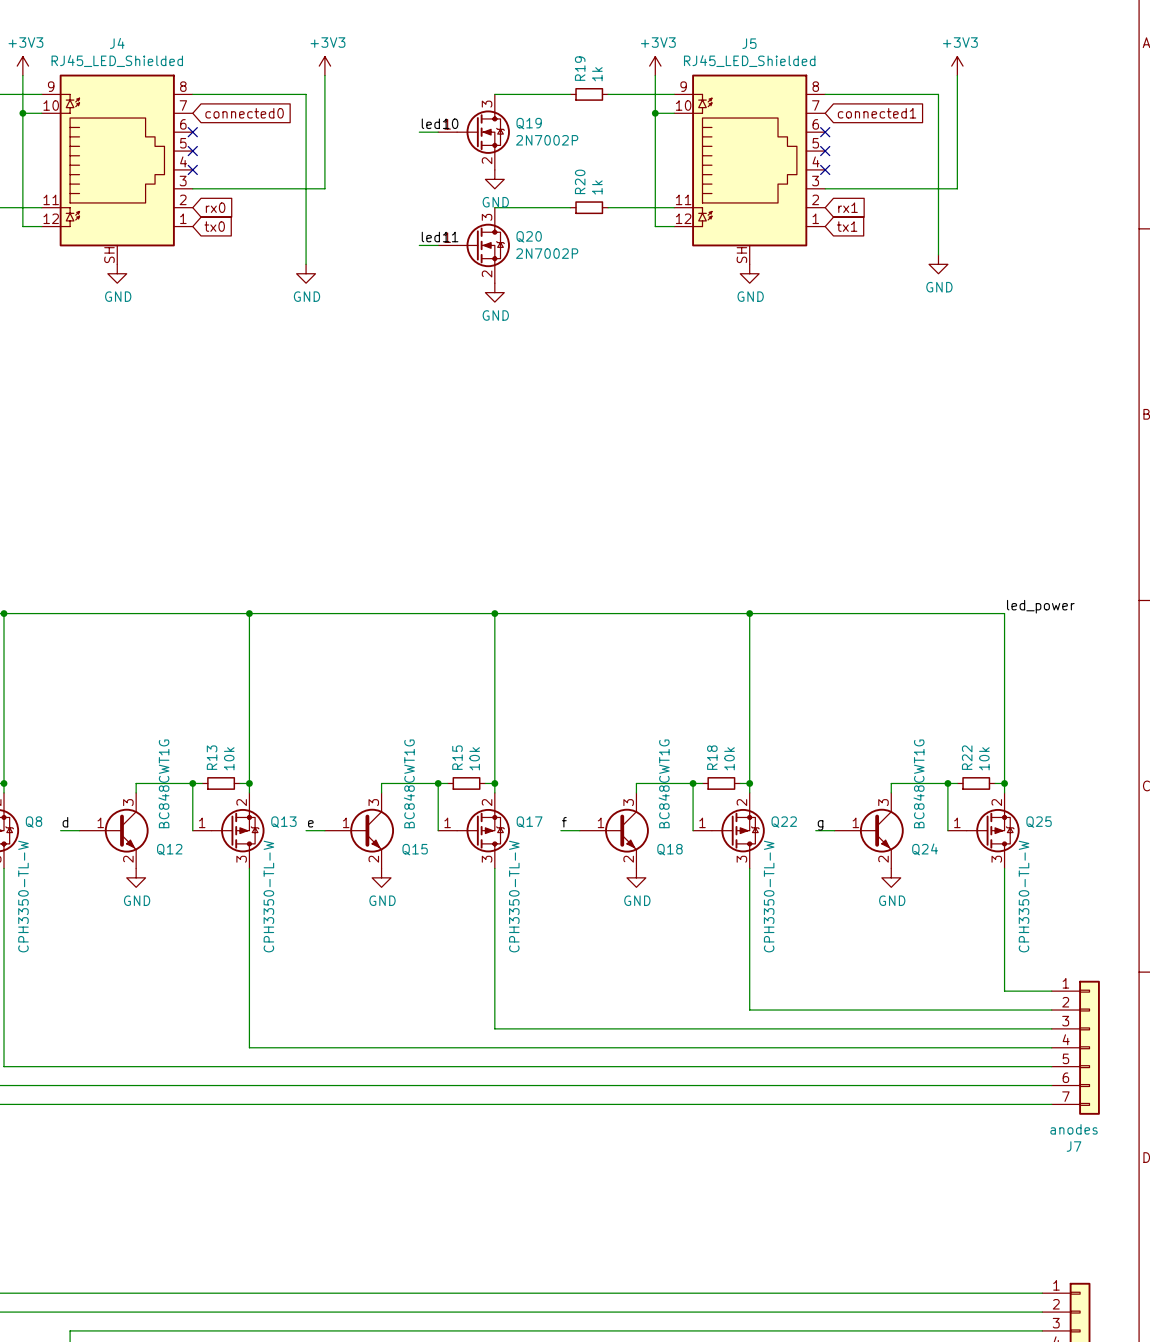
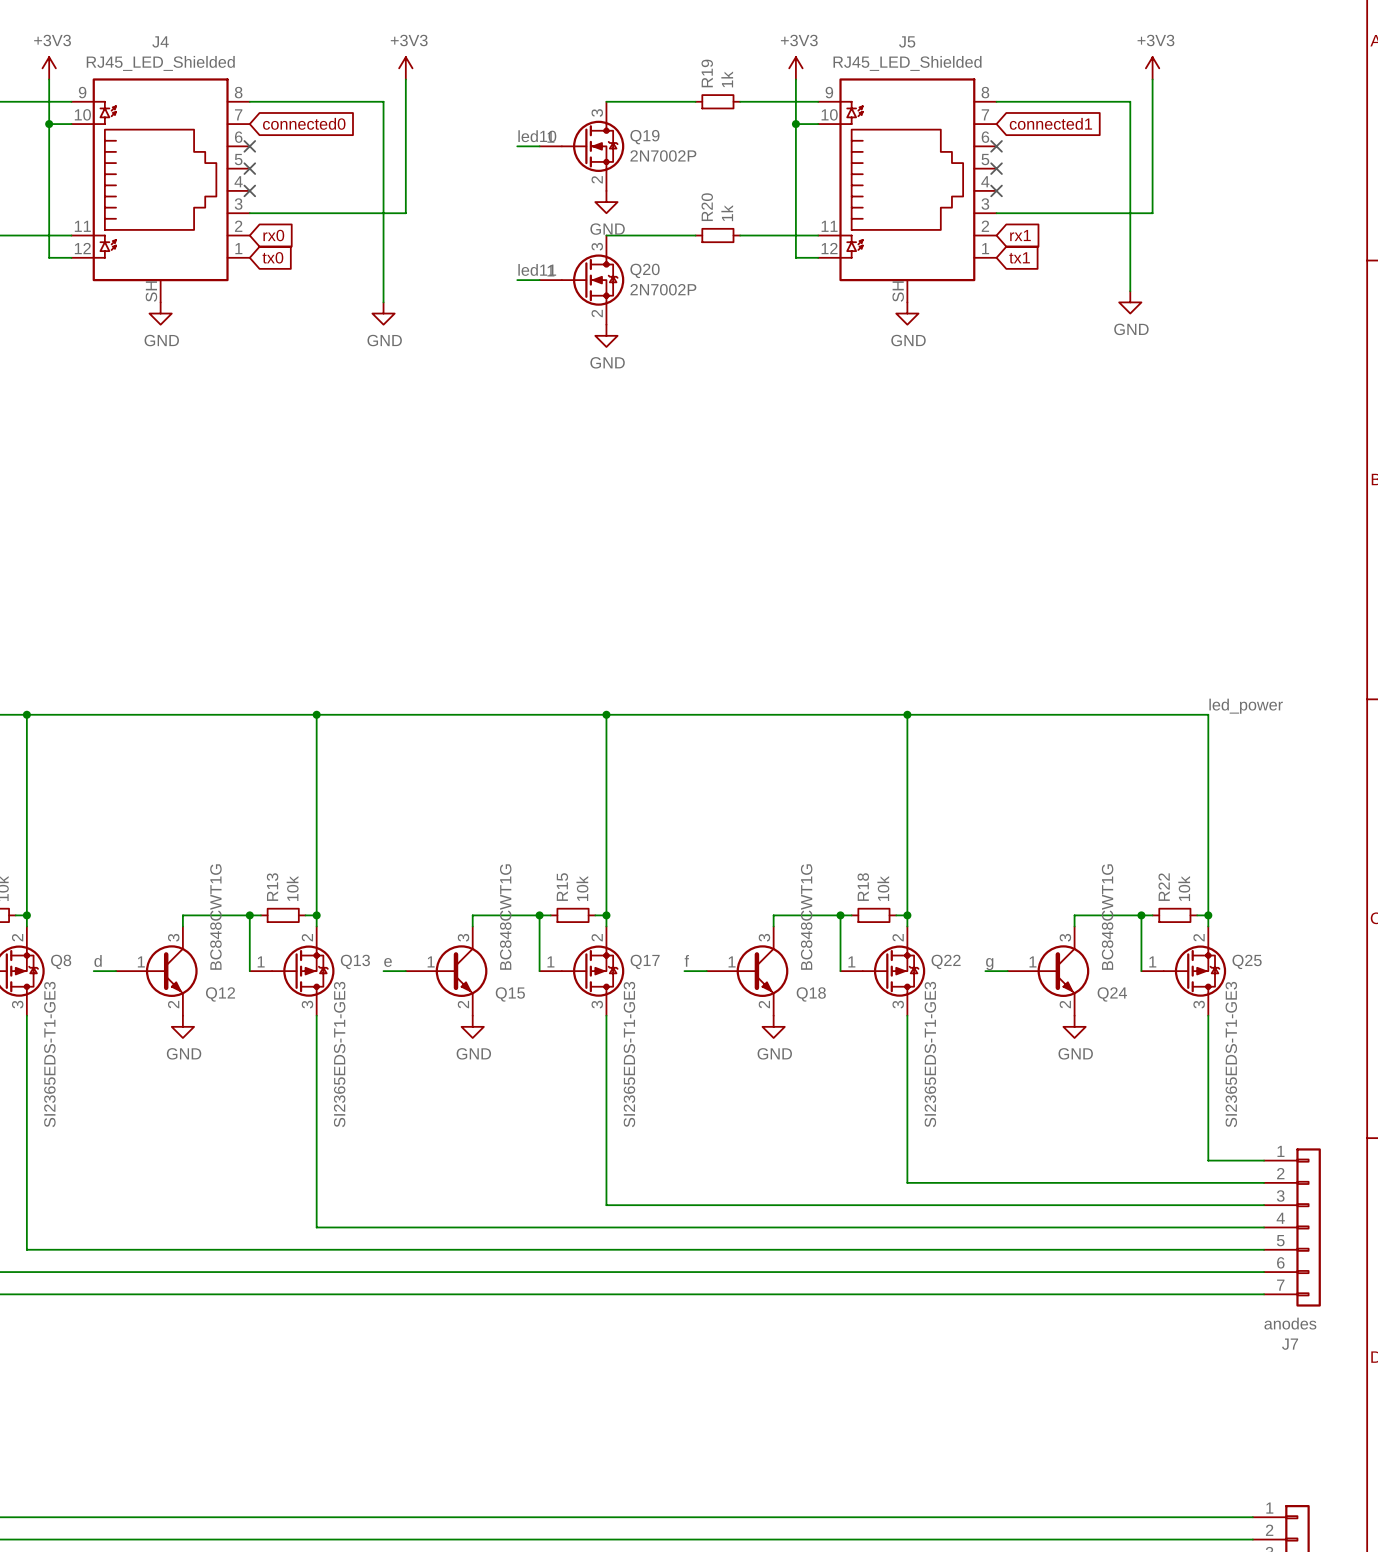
Q8 value: CPH3350-TL-W (23, 896) -> SI2365EDS-T1-GE3 (49, 1054)
Q13 value: CPH3350-TL-W (268, 896) -> SI2365EDS-T1-GE3 (339, 1054)
Q17 value: CPH3350-TL-W (514, 896) -> SI2365EDS-T1-GE3 (629, 1054)
Q22 value: CPH3350-TL-W (769, 896) -> SI2365EDS-T1-GE3 (930, 1054)
Q25 value: CPH3350-TL-W (1024, 896) -> SI2365EDS-T1-GE3 (1231, 1054)

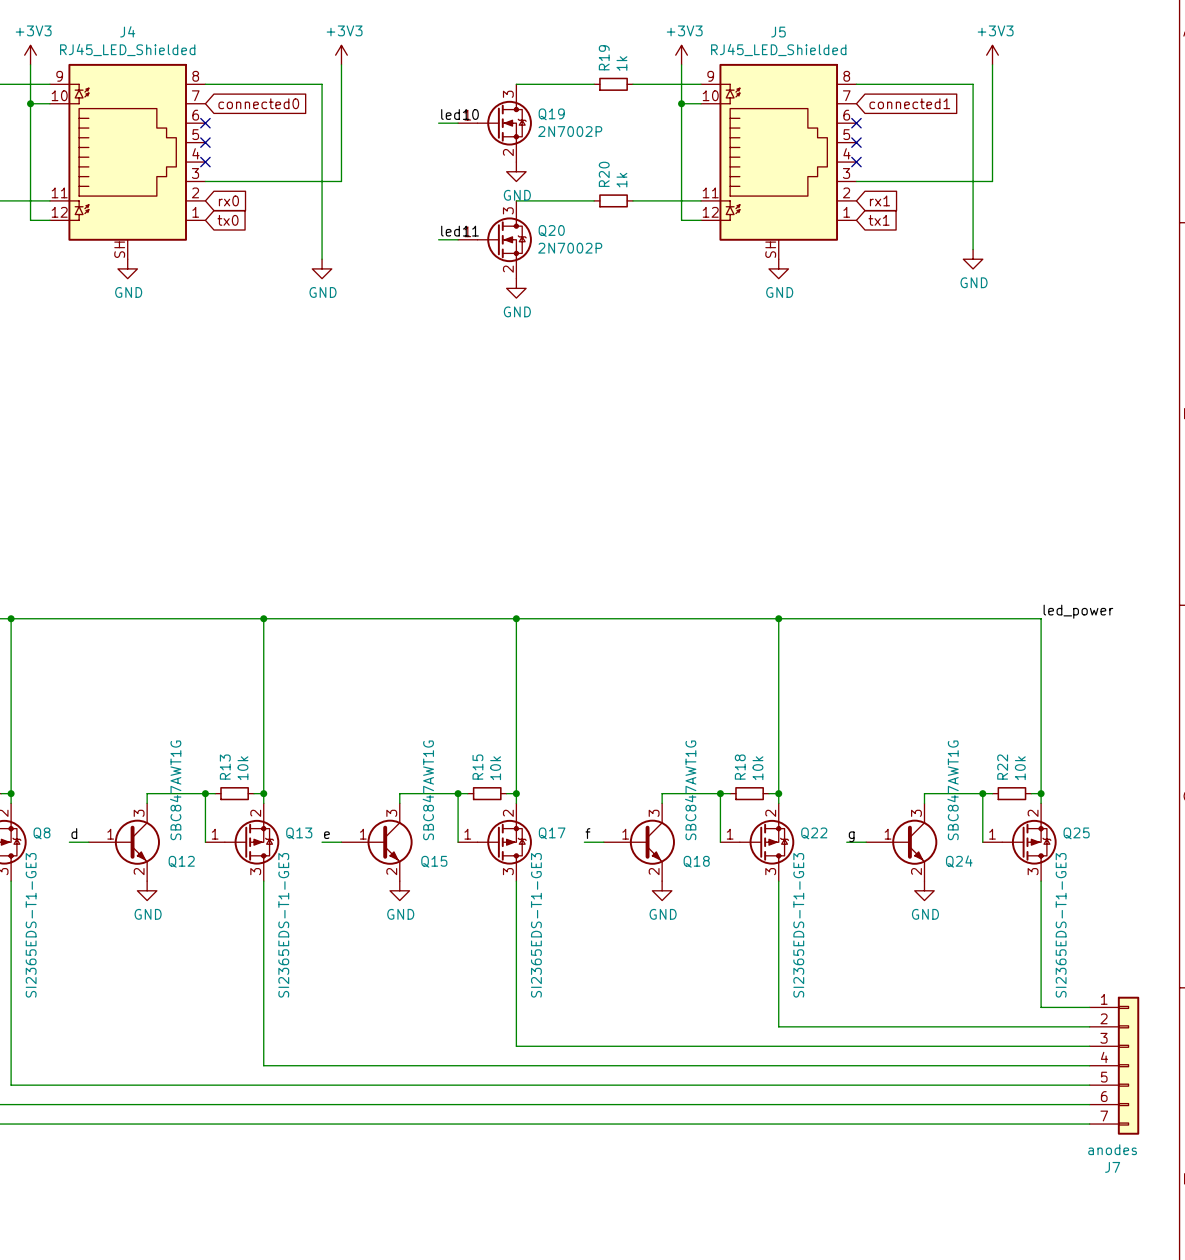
Q12 value: BC848CWT1G (215, 917) -> SBC847AWT1G (175, 790)
Q15 value: BC848CWT1G (505, 917) -> SBC847AWT1G (428, 790)
Q18 value: BC848CWT1G (806, 917) -> SBC847AWT1G (690, 790)
Q24 value: BC848CWT1G (1107, 917) -> SBC847AWT1G (953, 790)

